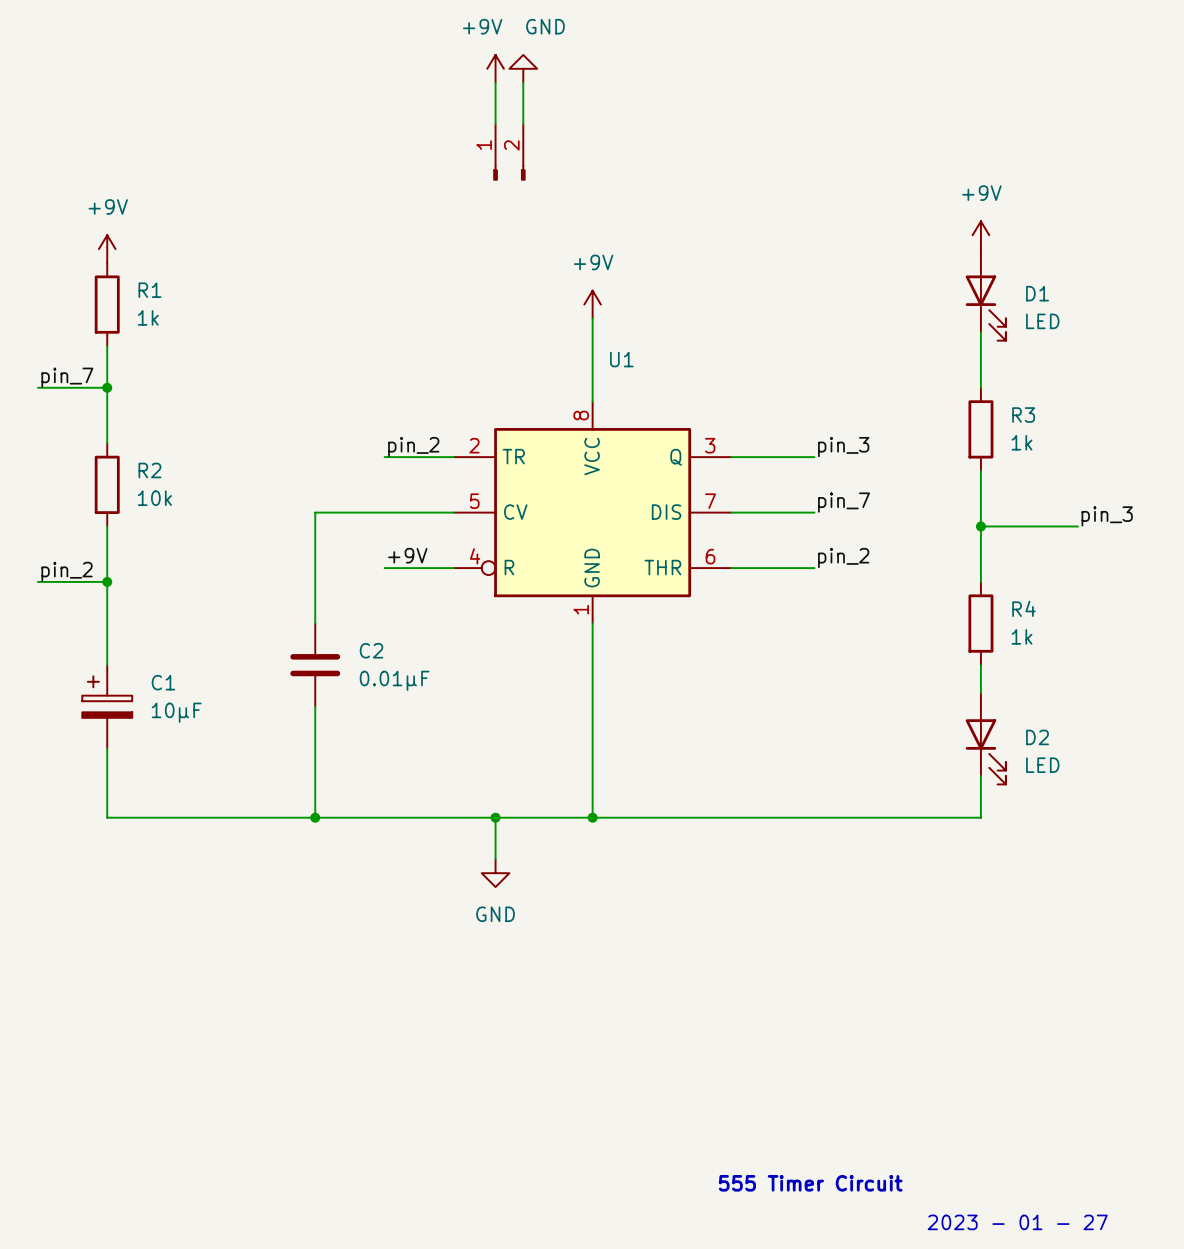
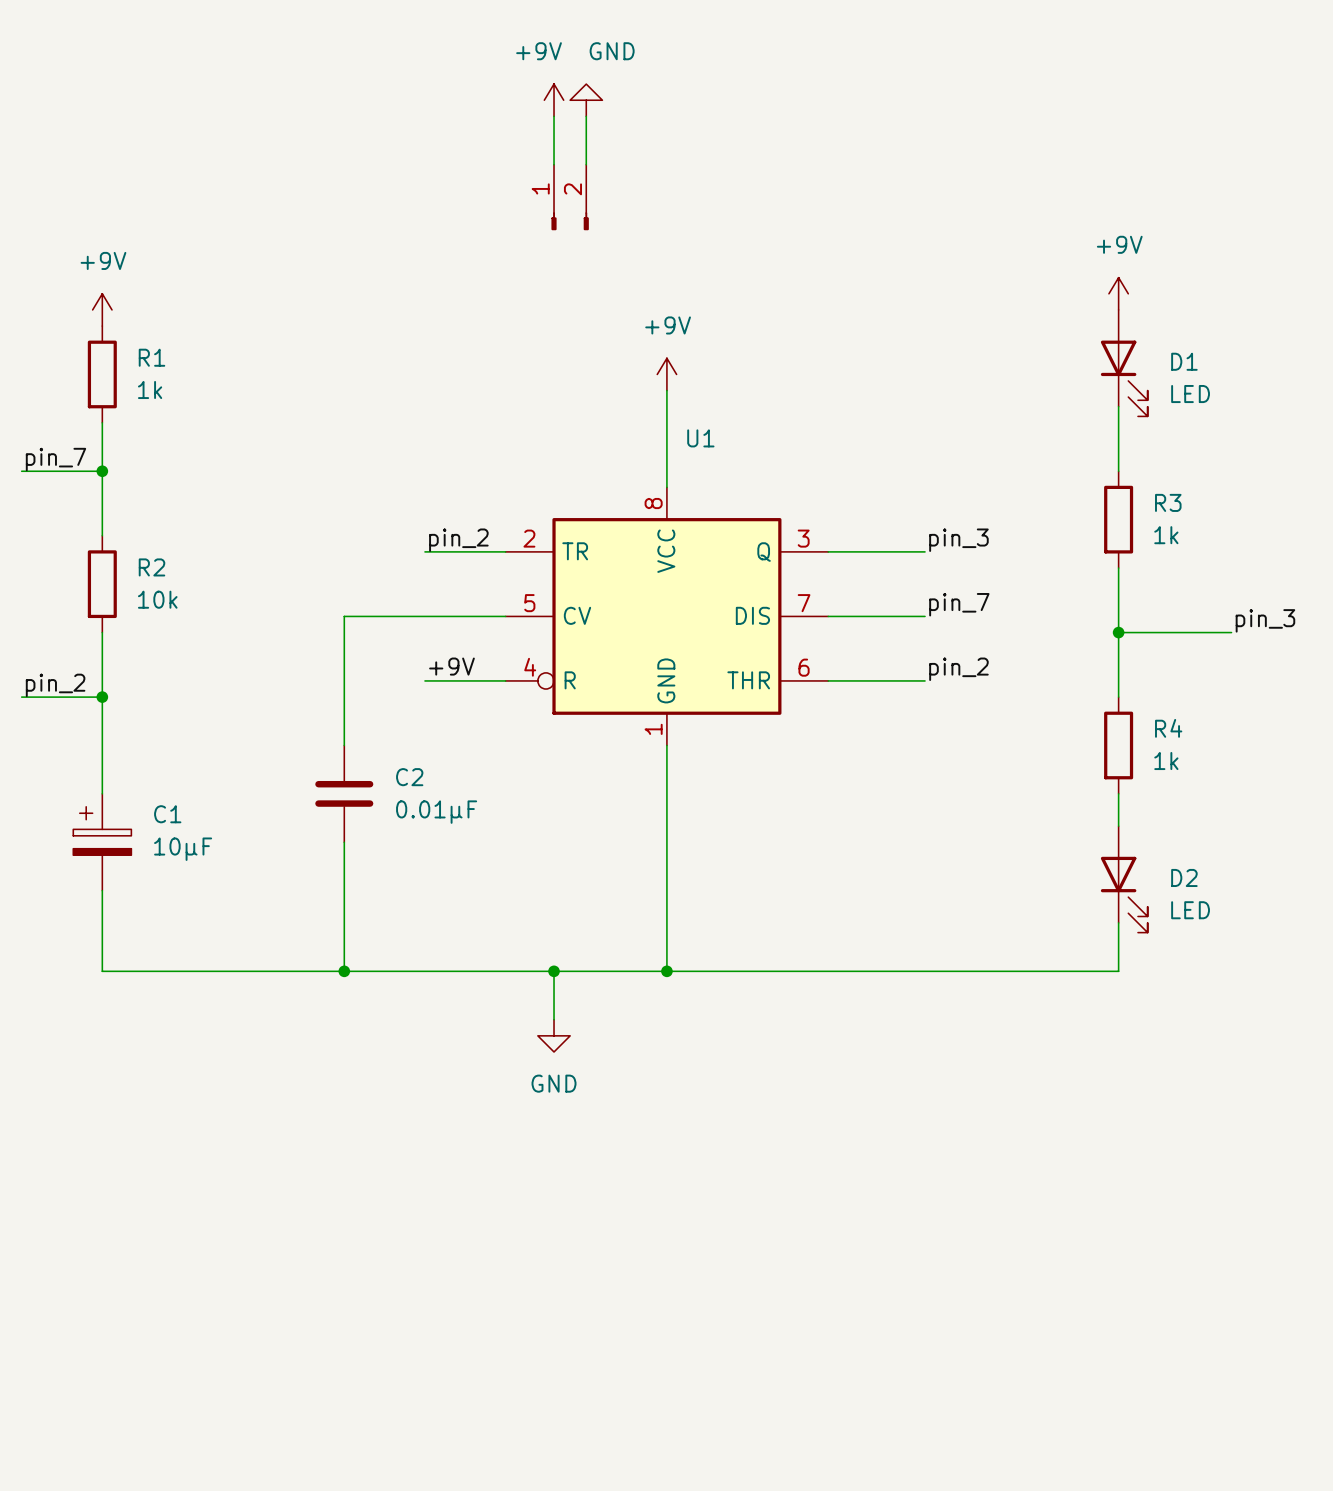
text: 555 Timer Circuit (810, 1183) -> none
text: 2023 - 01 - 27 (1017, 1222) -> none

